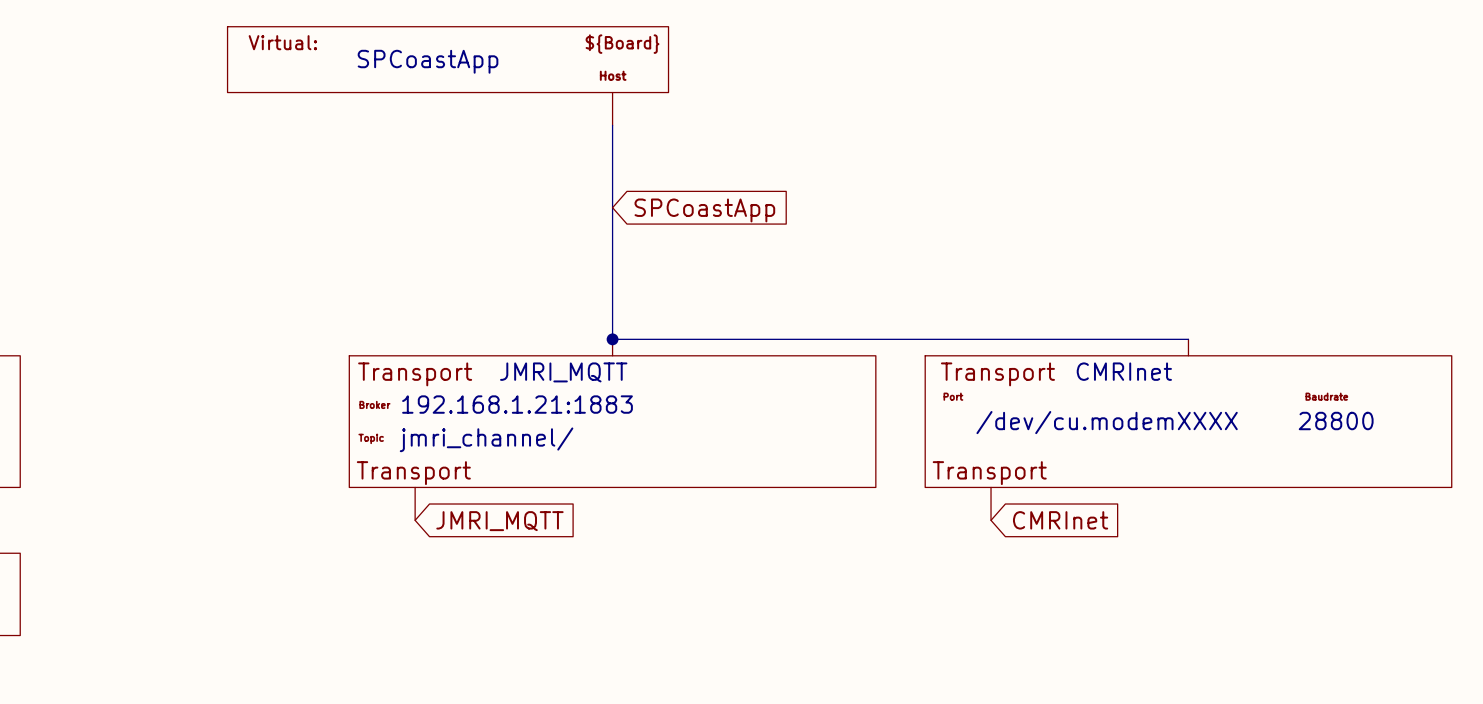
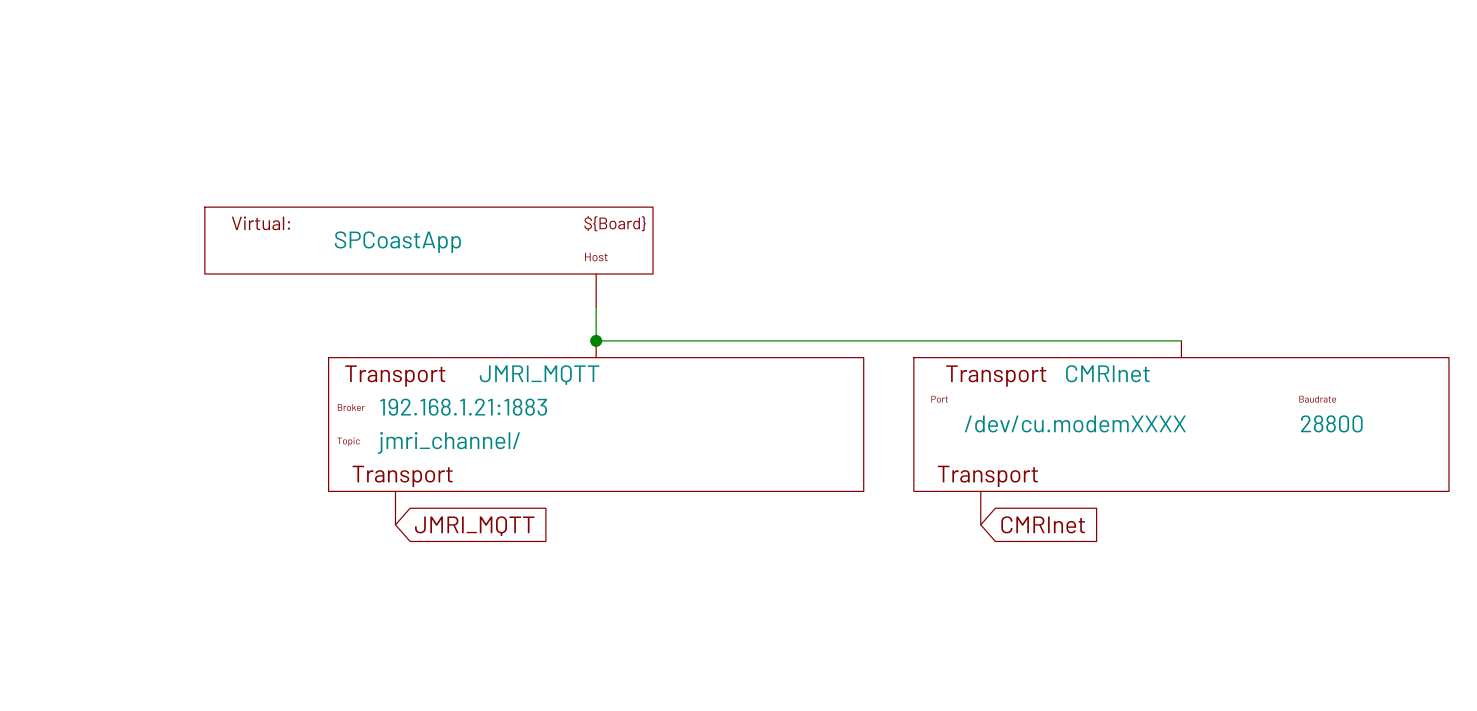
part position: (448, 76) -> (428, 257)
wire: (612, 125) (612, 306) -> none
global label: SPCoastApp (704, 210) -> none

